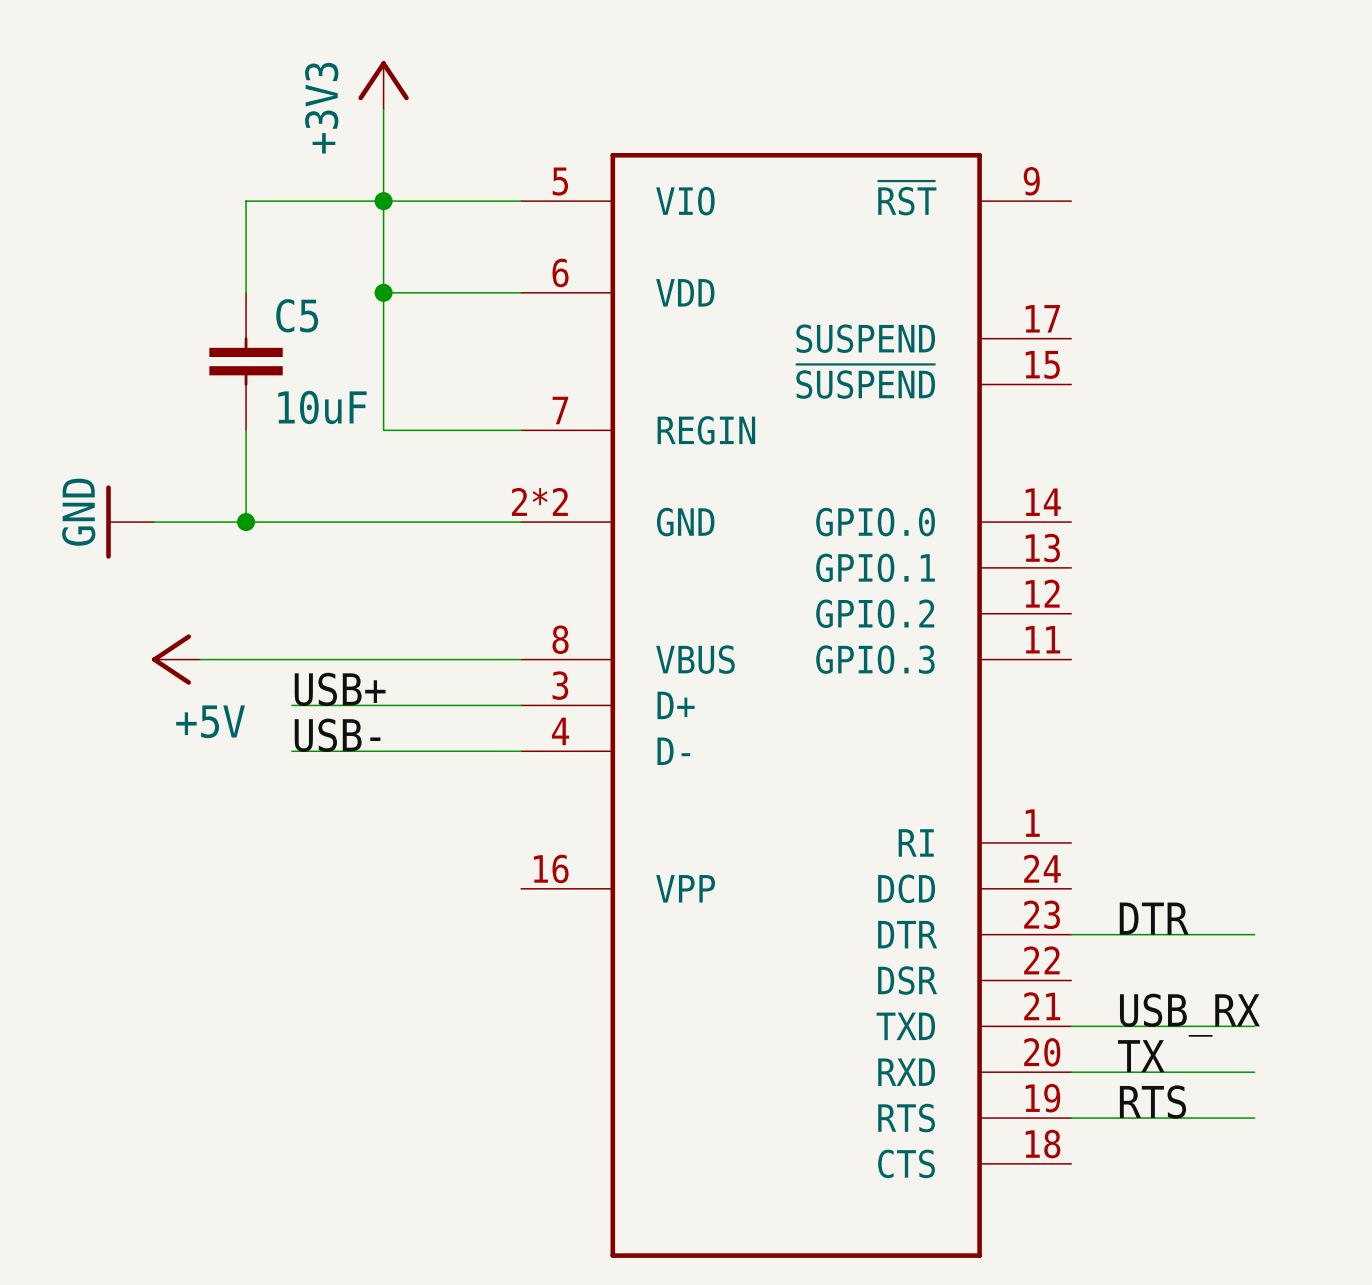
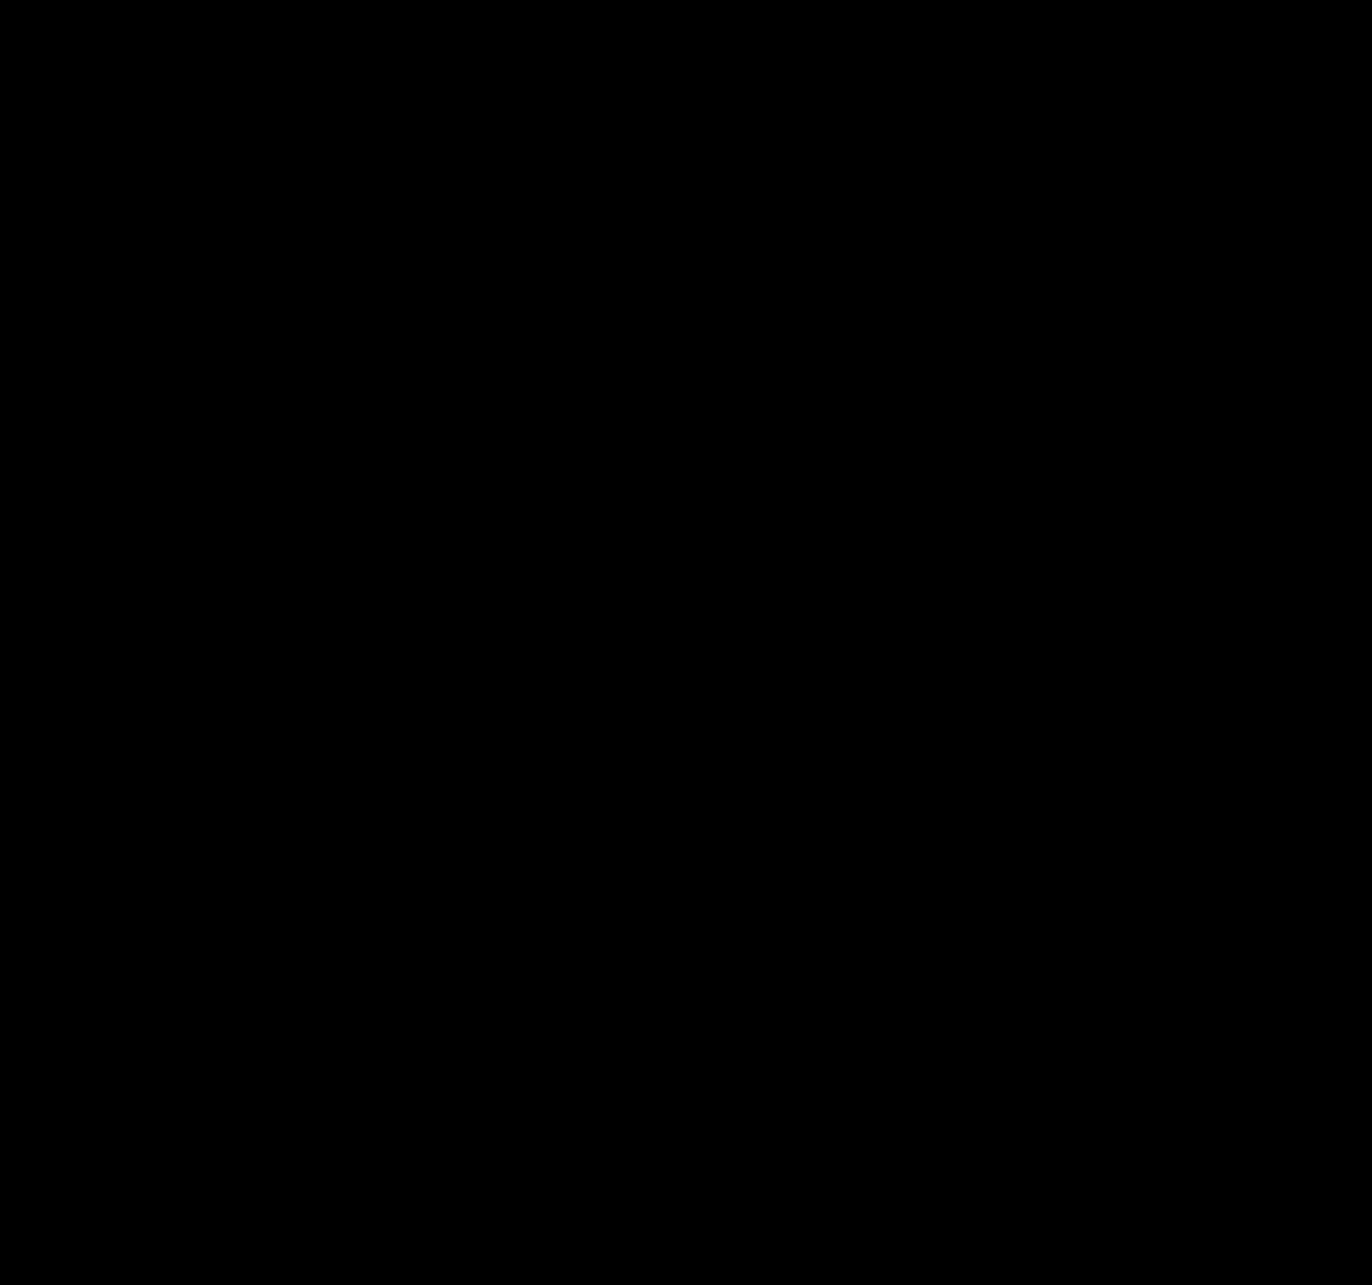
power symbol: +3V3 (383, 85) -> none
wire: (383, 109) (383, 430) (521, 430) -> none
junction: (383, 201) -> none
wire: (521, 201) (246, 201) (246, 292) -> none
wire: (383, 292) (521, 292) -> none
junction: (383, 292) -> none
C5: 10uF (246, 361) -> none
wire: (246, 430) (246, 522) -> none
power symbol: GND (130, 522) -> none
wire: (154, 522) (521, 522) -> none
junction: (246, 522) -> none
power symbol: +5V (176, 659) -> none
wire: (200, 659) (521, 659) -> none
label: USB+ (340, 689) -> none
wire: (291, 705) (521, 705) -> none
part: (796, 705) -> none
label: USB- (337, 735) -> none
wire: (291, 751) (521, 751) -> none
label: DTR (1154, 918) -> none
wire: (1071, 934) (1254, 934) -> none
label: USB_RX (1189, 1015) -> none
wire: (1071, 1026) (1254, 1026) -> none
label: TX (1141, 1056) -> none
wire: (1071, 1072) (1254, 1072) -> none
label: RTS (1152, 1102) -> none
wire: (1071, 1118) (1254, 1118) -> none

